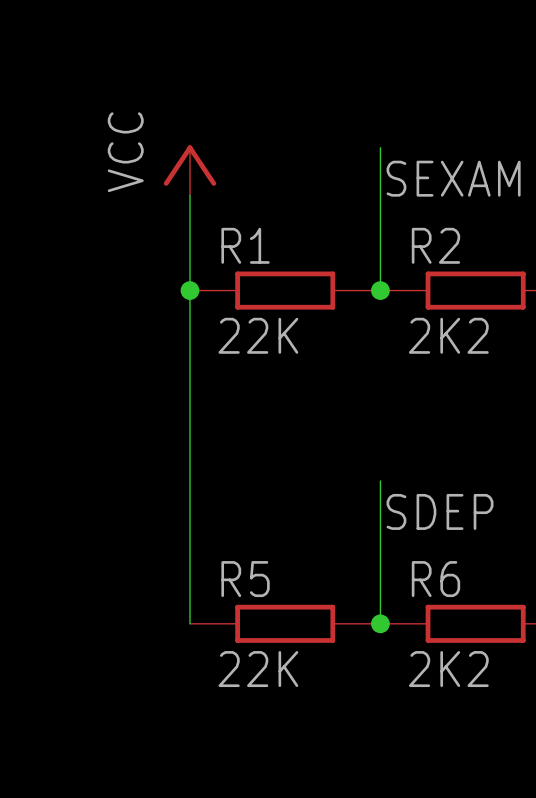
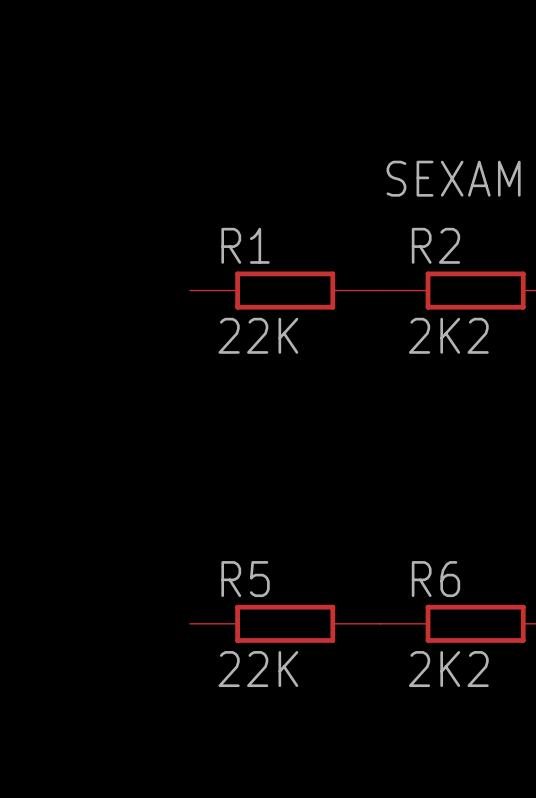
wire: (380, 147) (380, 290) -> none
power symbol: VCC (189, 170) -> none
wire: (189, 195) (189, 623) -> none
junction: (189, 290) -> none
junction: (380, 290) -> none
wire: (380, 480) (380, 623) -> none
label: SDEP (440, 511) -> none
junction: (380, 623) -> none

